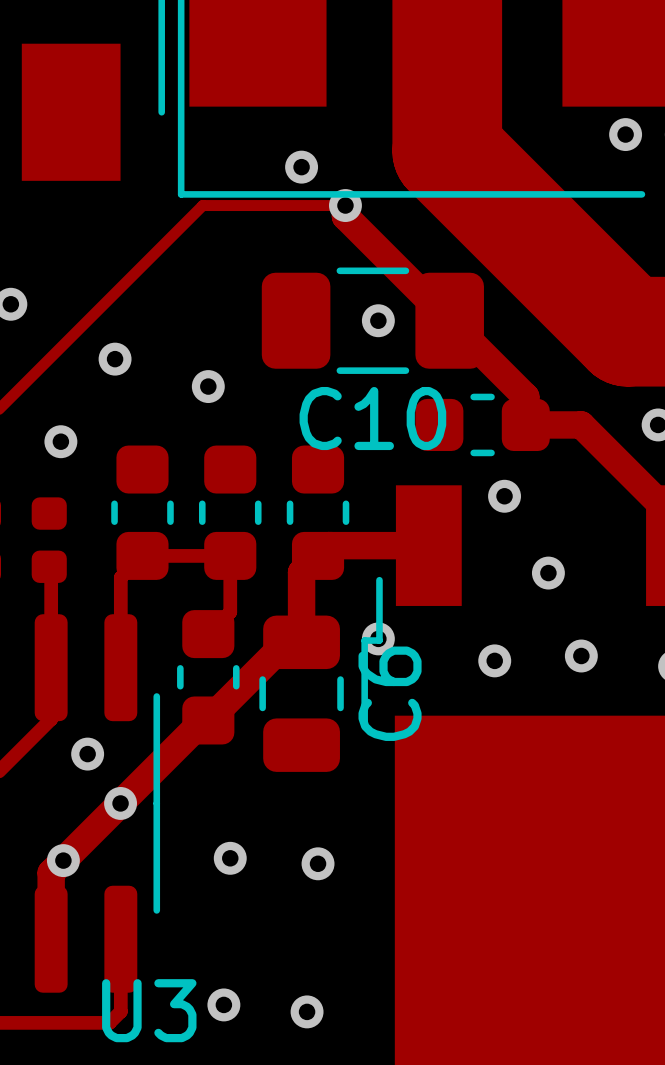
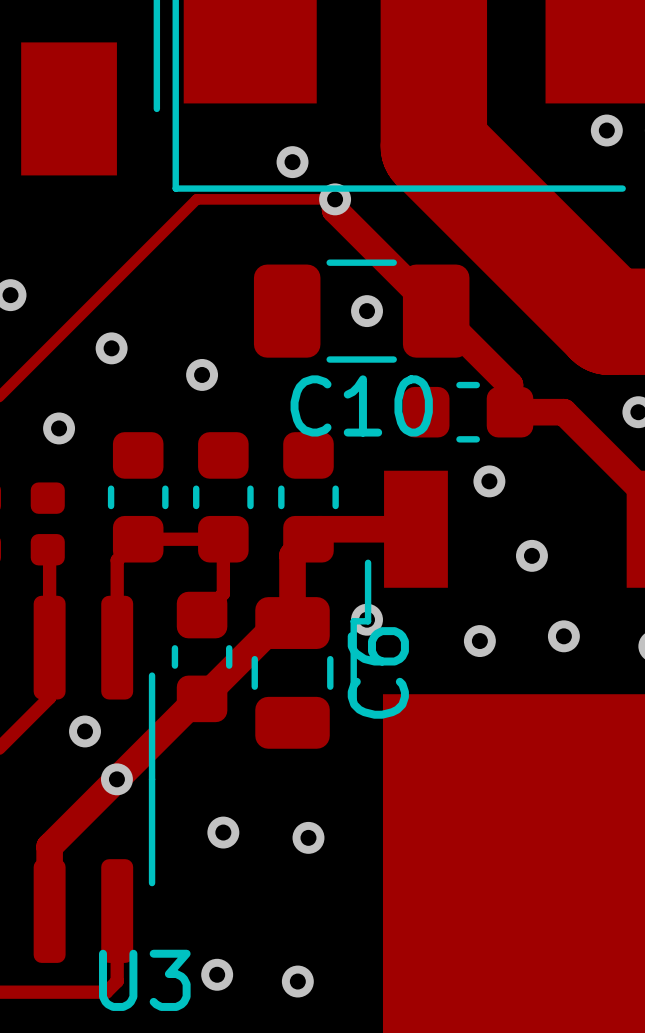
via: (63, 860) -> none

